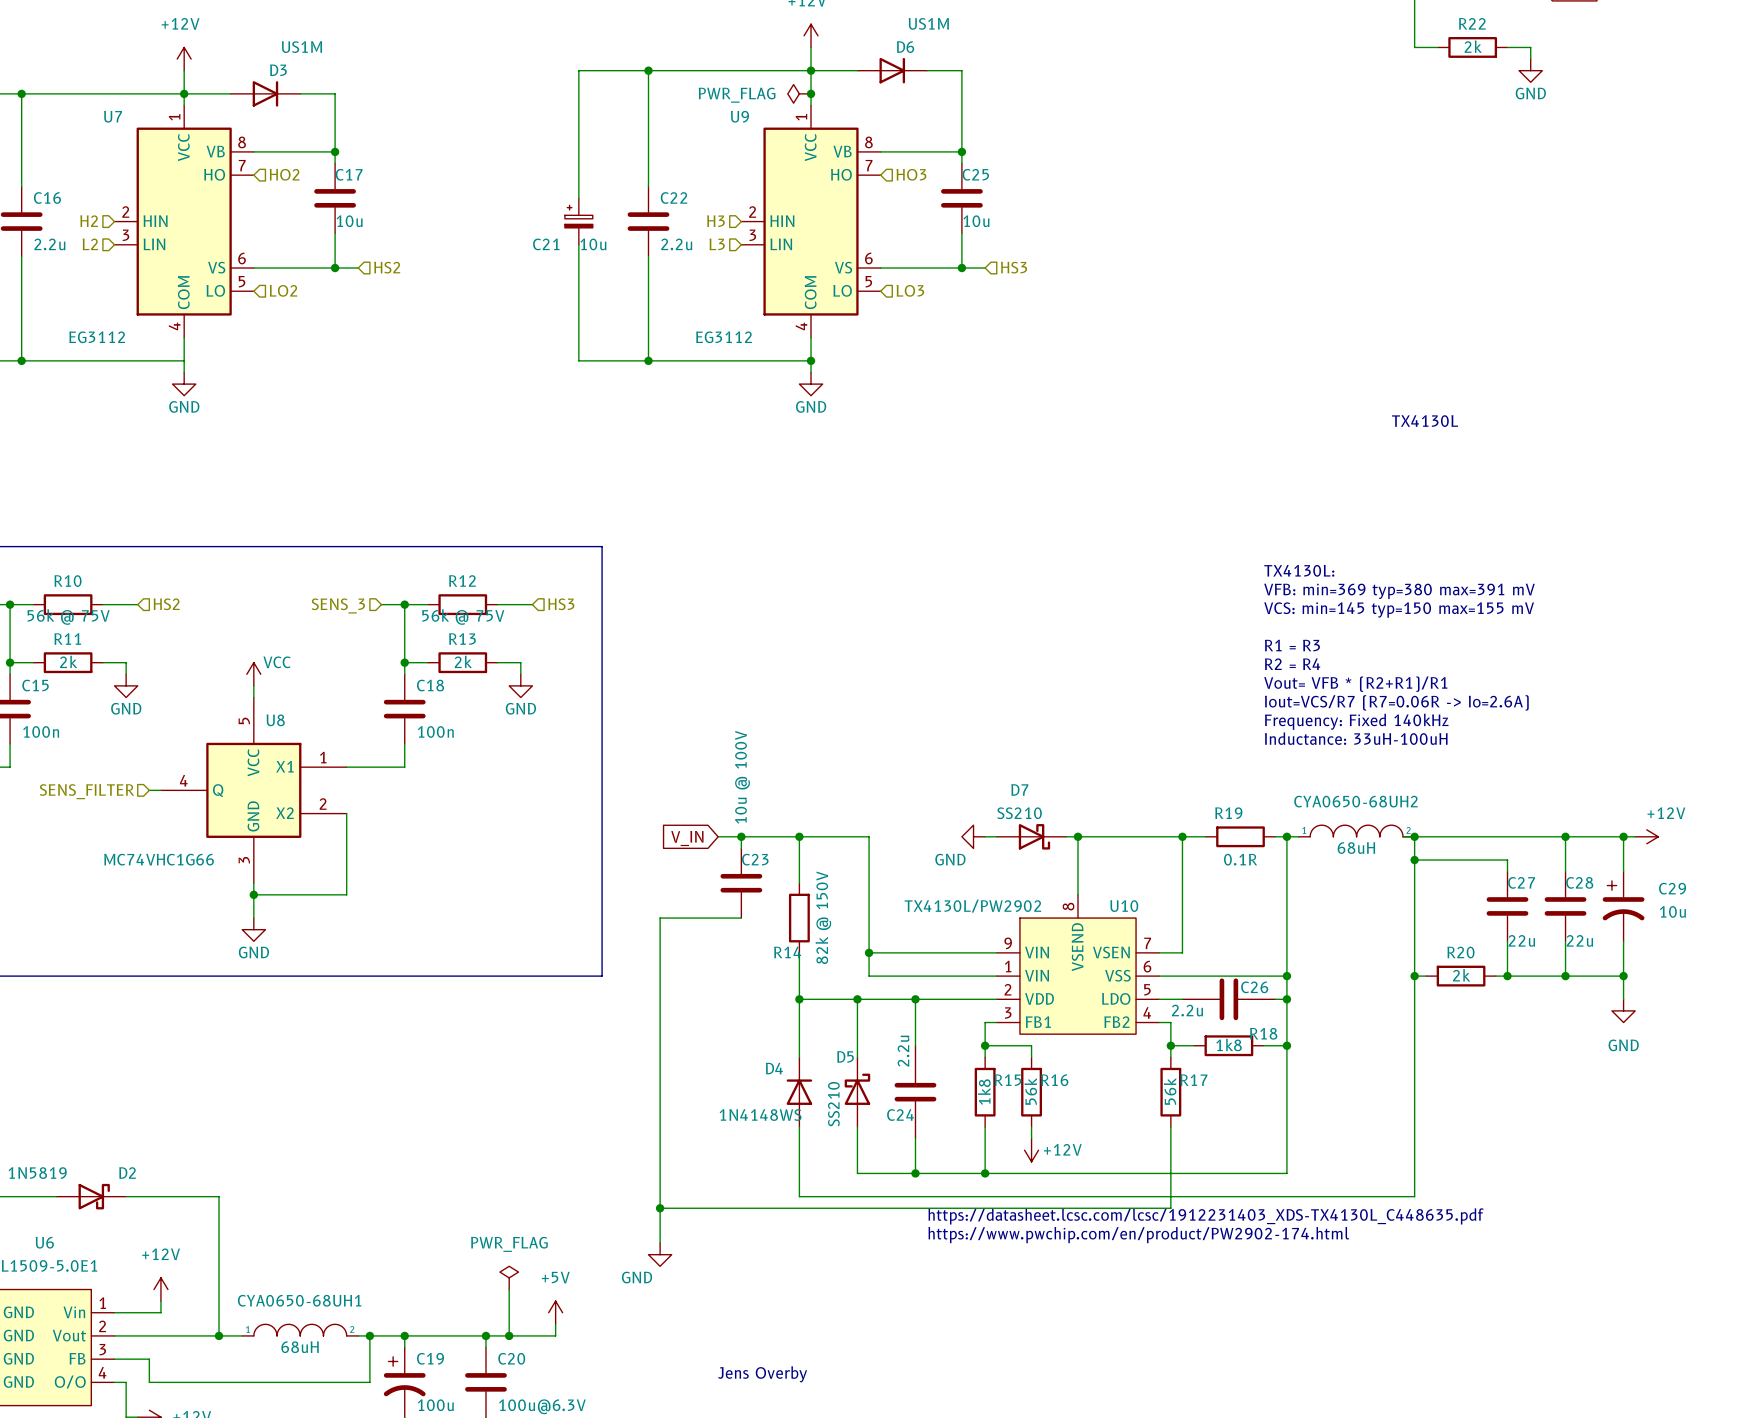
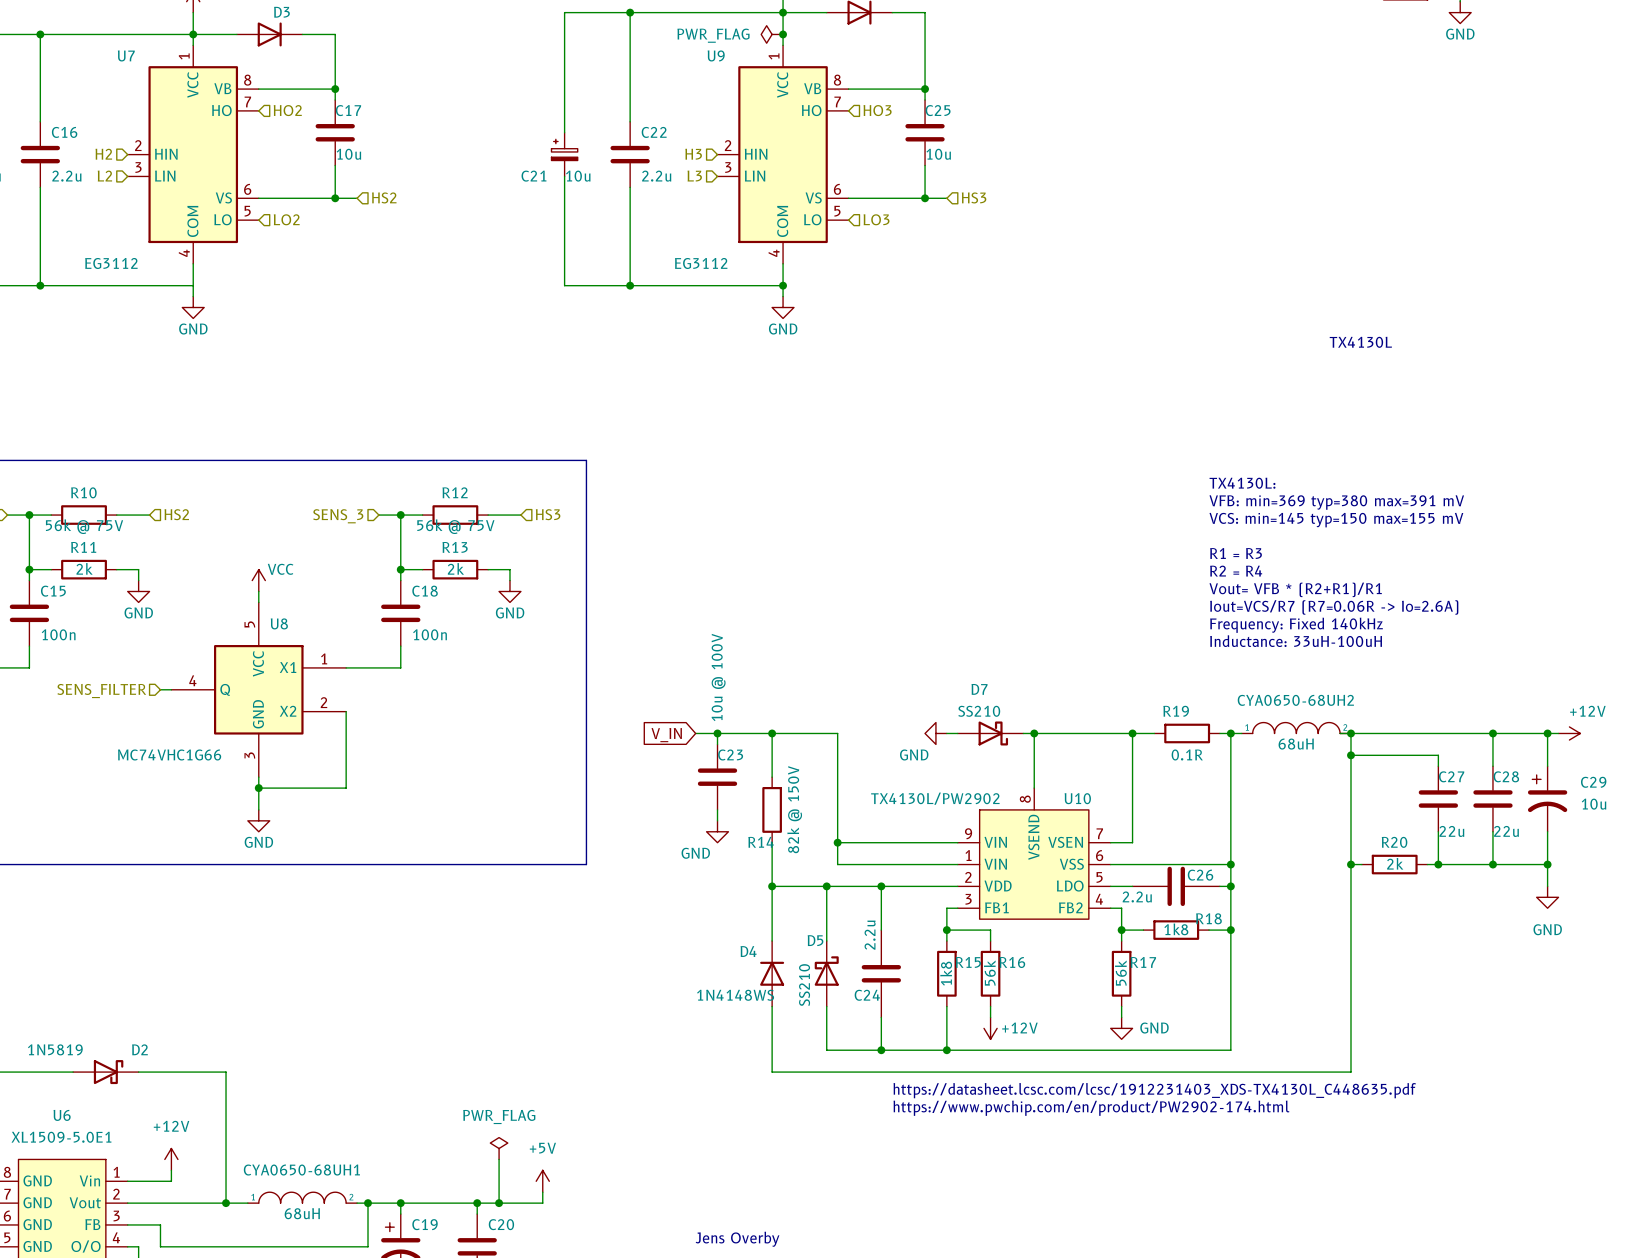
wire: (741, 918) (660, 918) (660, 1243) -> (717, 809) (717, 820)
power symbol: none -> GND (717, 831)
wire: (1170, 1138) (1170, 1208) (660, 1208) -> none
power symbol: none -> GND (1121, 1028)
junction: (660, 1208) -> none
power symbol: GND (660, 1254) -> none

